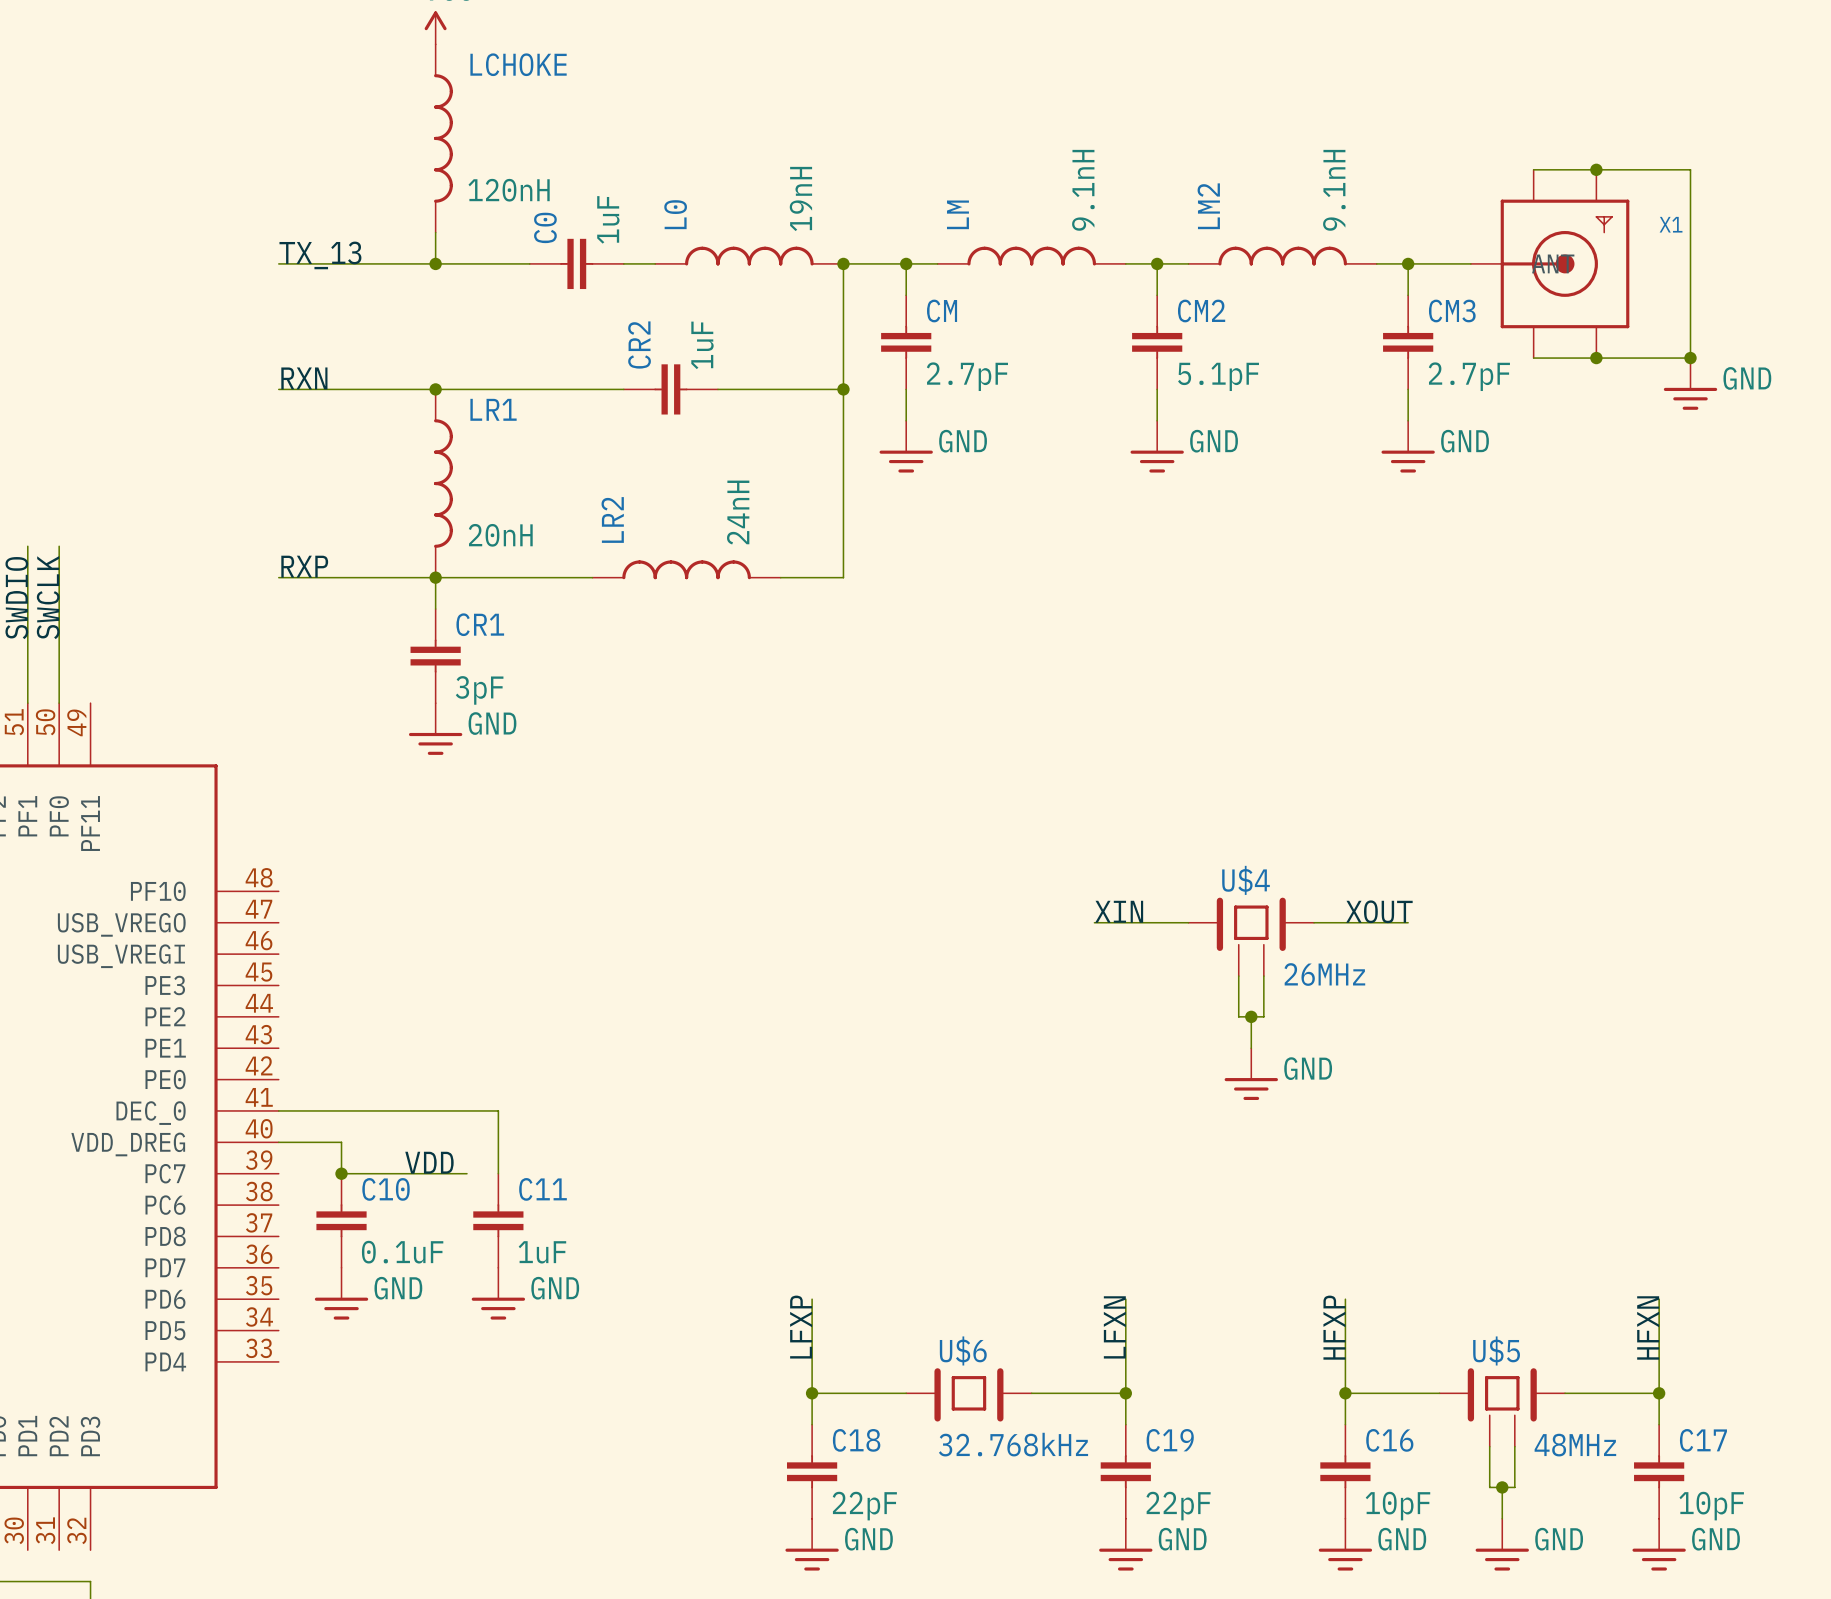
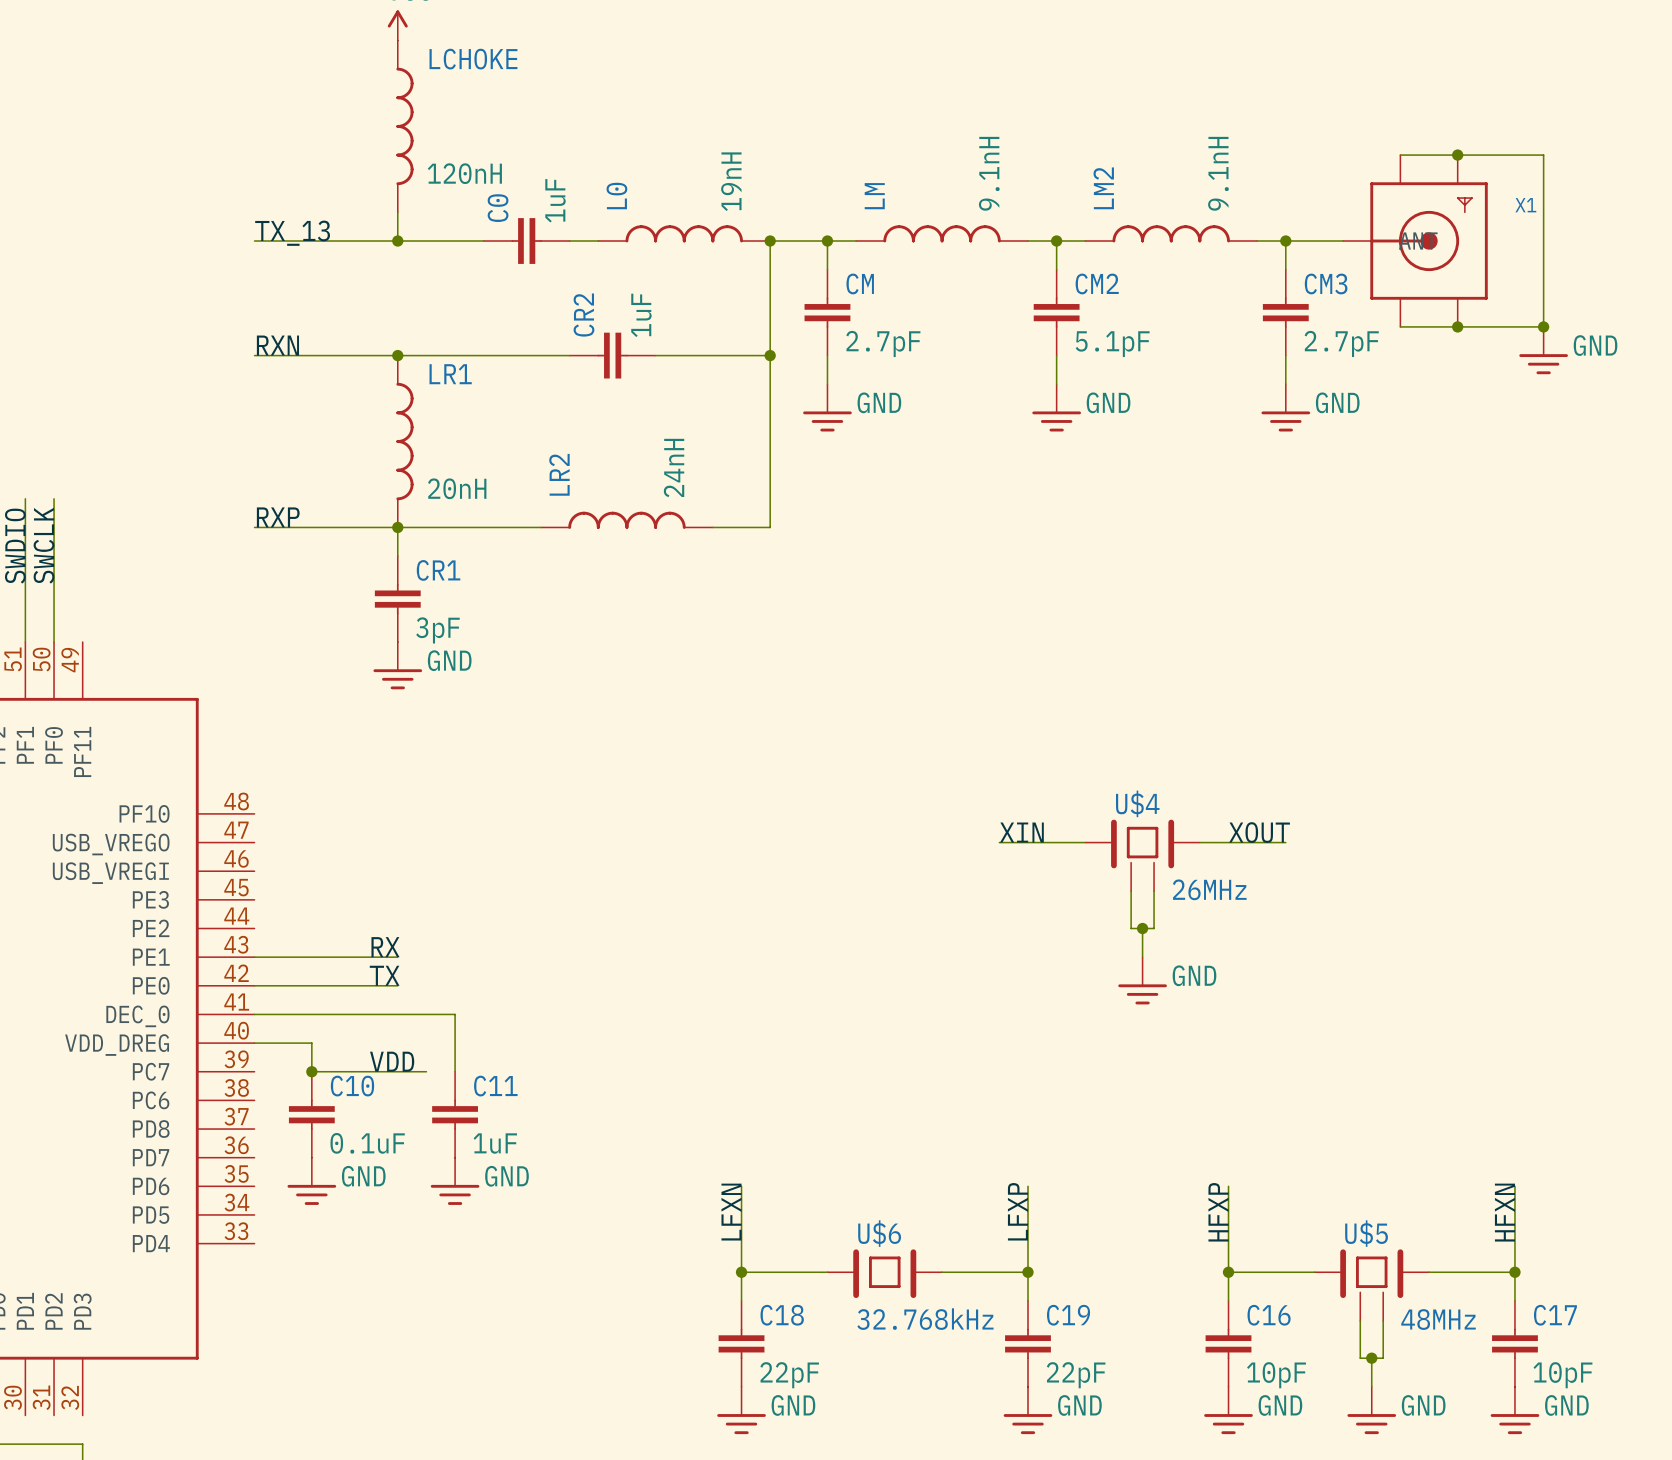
label: none -> RX (385, 947)
wire: none -> (254, 957) (397, 957)
label: none -> TX (384, 975)
wire: none -> (254, 985) (397, 985)
label: LFXP (801, 1327) -> LFXN (731, 1212)
label: LFXN (1114, 1327) -> LFXP (1017, 1211)

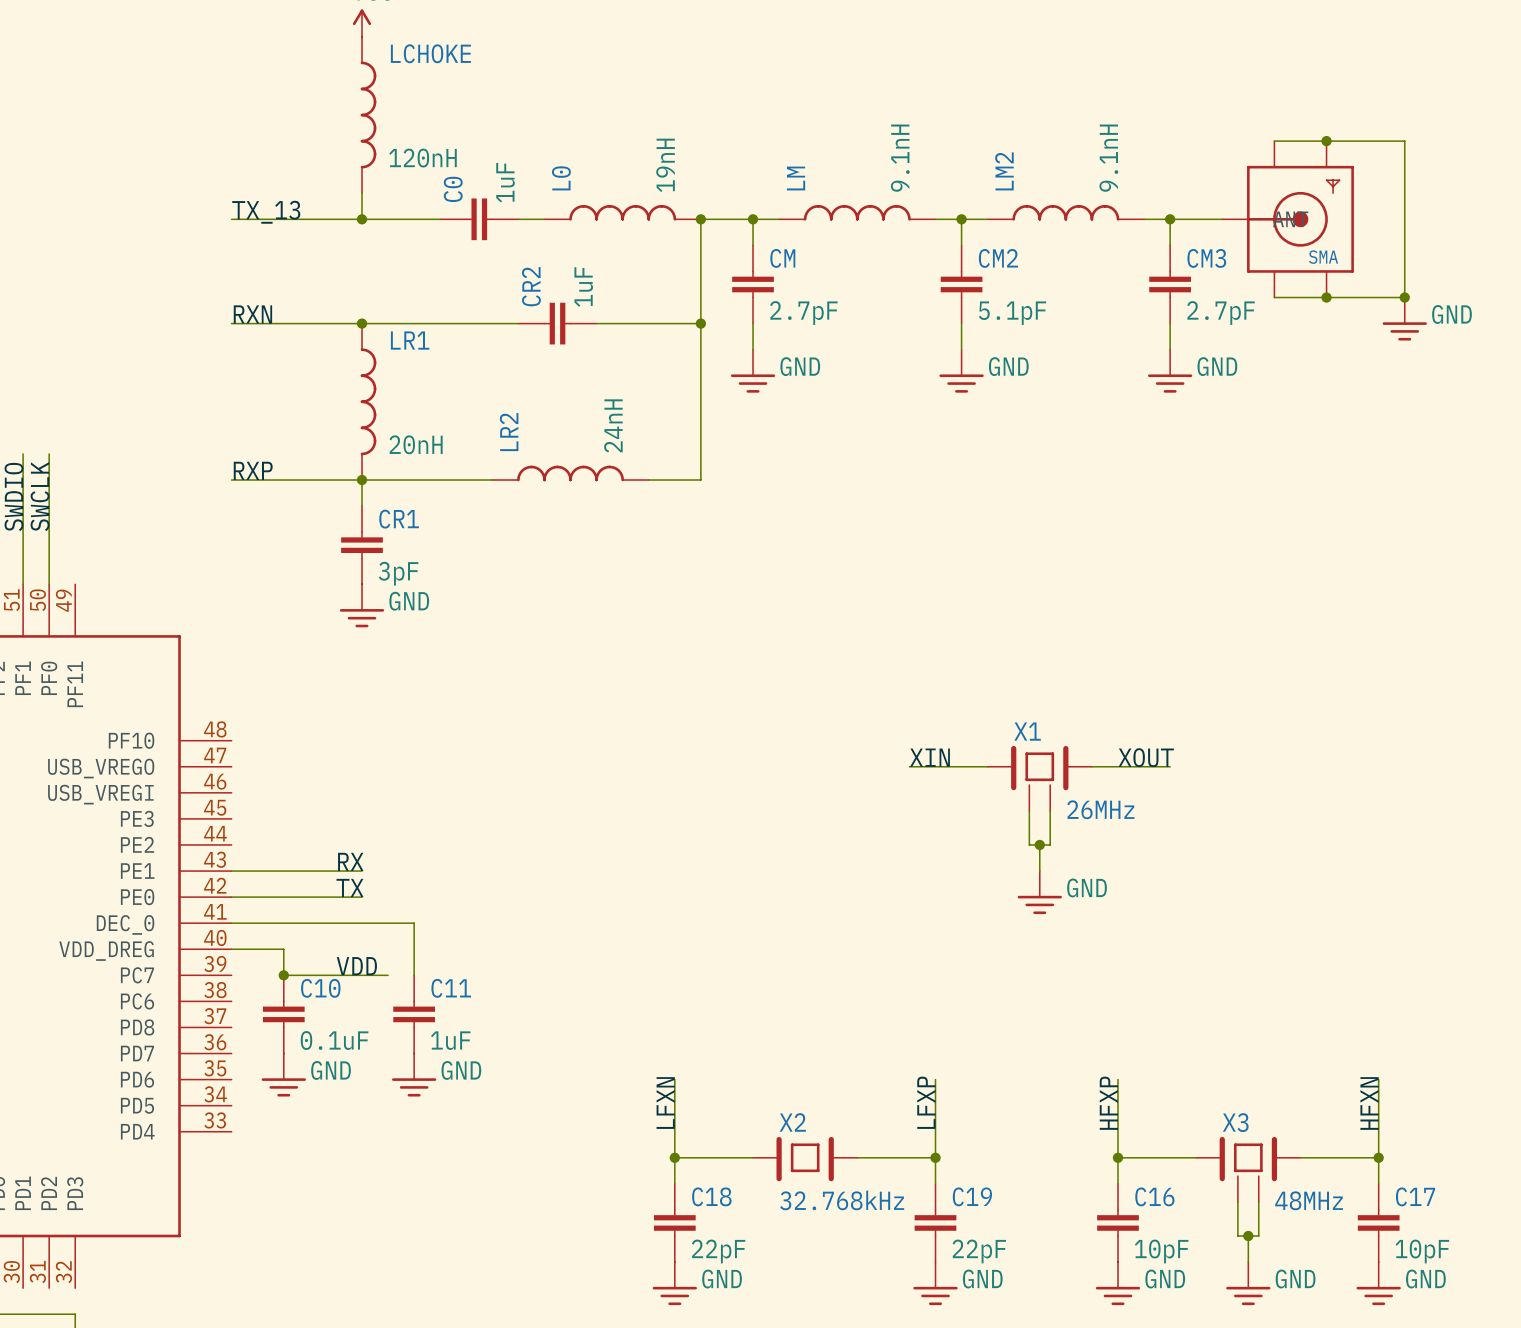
X1 name: X1 (1525, 205) -> SMA (1323, 257)
U$4 name: U$4 (1137, 803) -> X1 (1027, 731)
U$6 name: U$6 (879, 1233) -> X2 (792, 1122)
U$5 name: U$5 (1366, 1233) -> X3 (1235, 1122)

